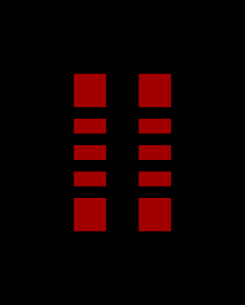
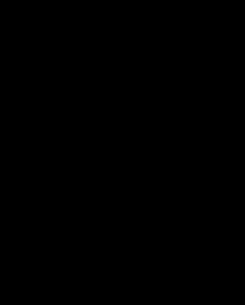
part: (122, 152) -> none

